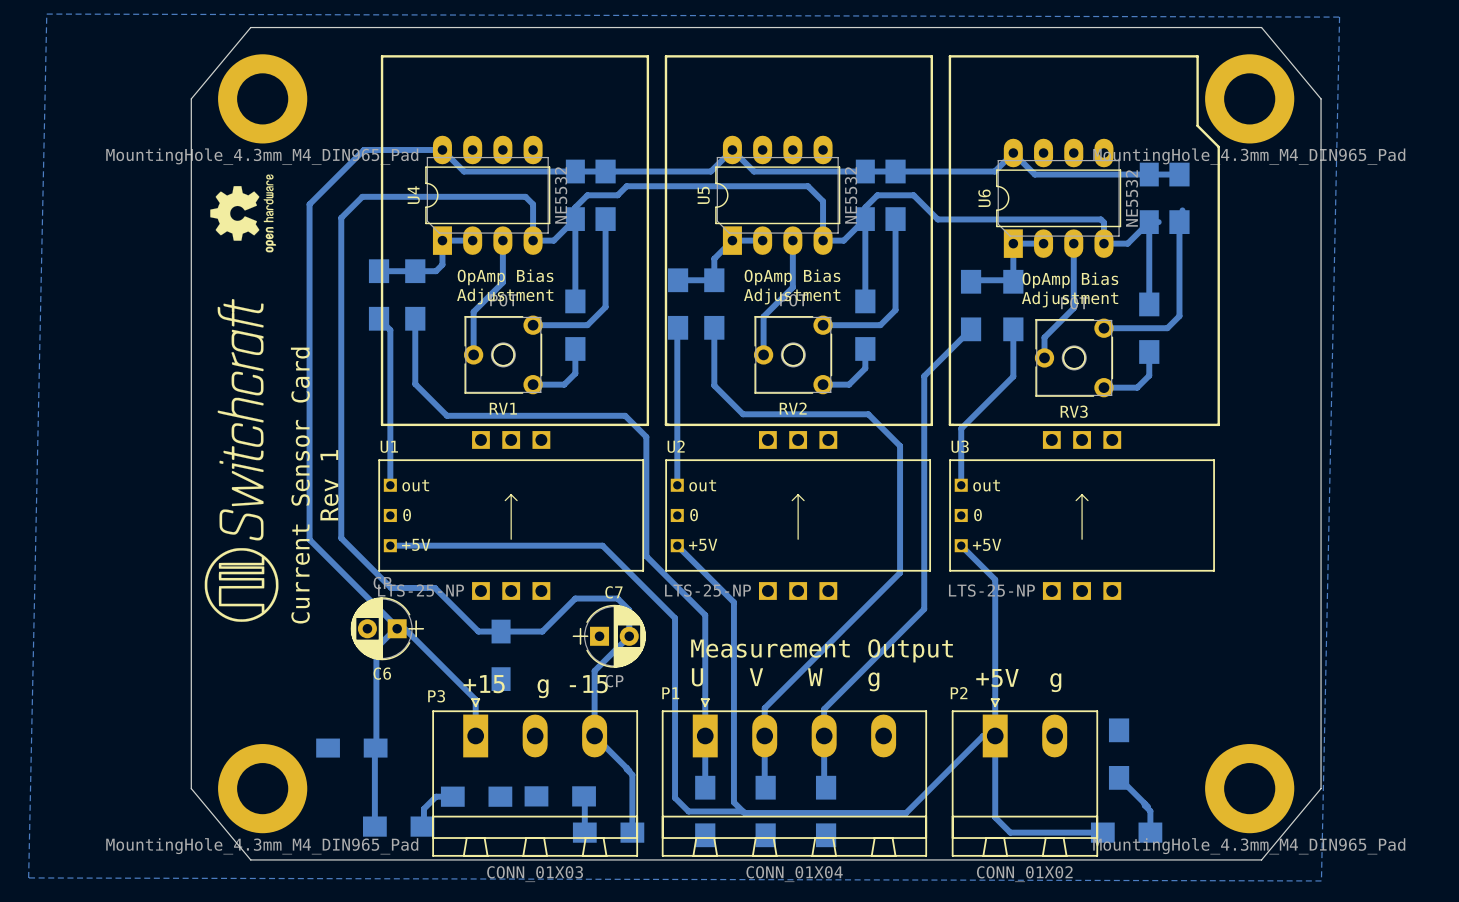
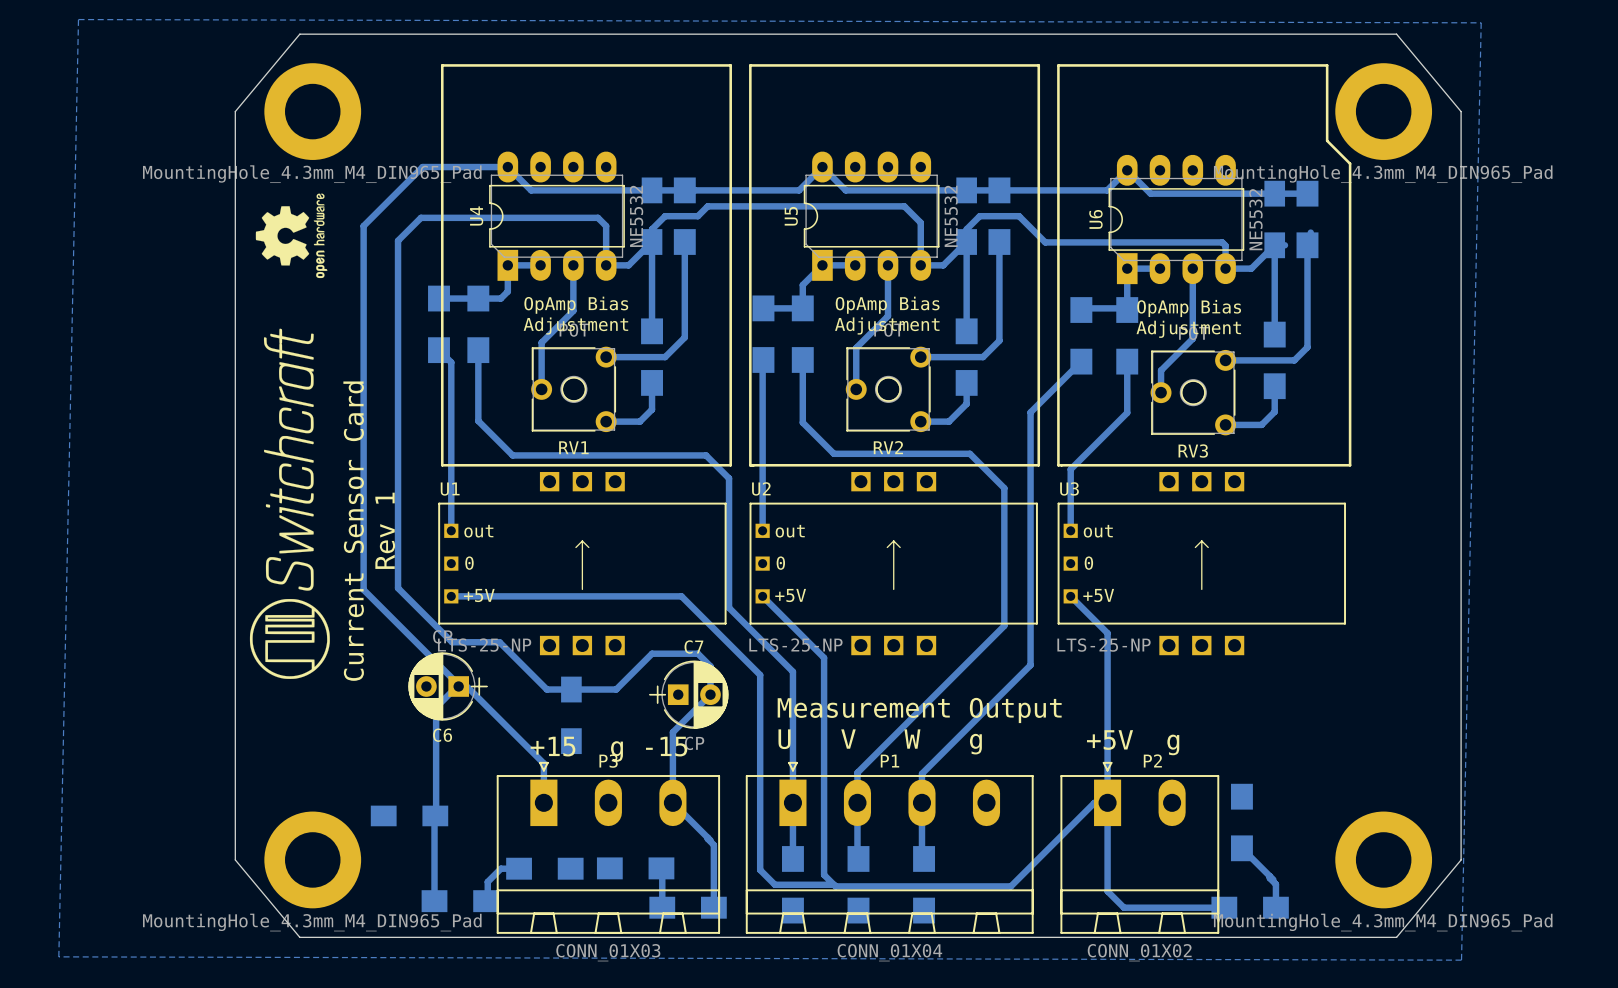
P1 name position: P1 (670, 693) -> P1 (889, 761)
P2 name position: P2 (959, 693) -> P2 (1152, 760)
P3 name position: P3 (436, 696) -> P3 (608, 761)

